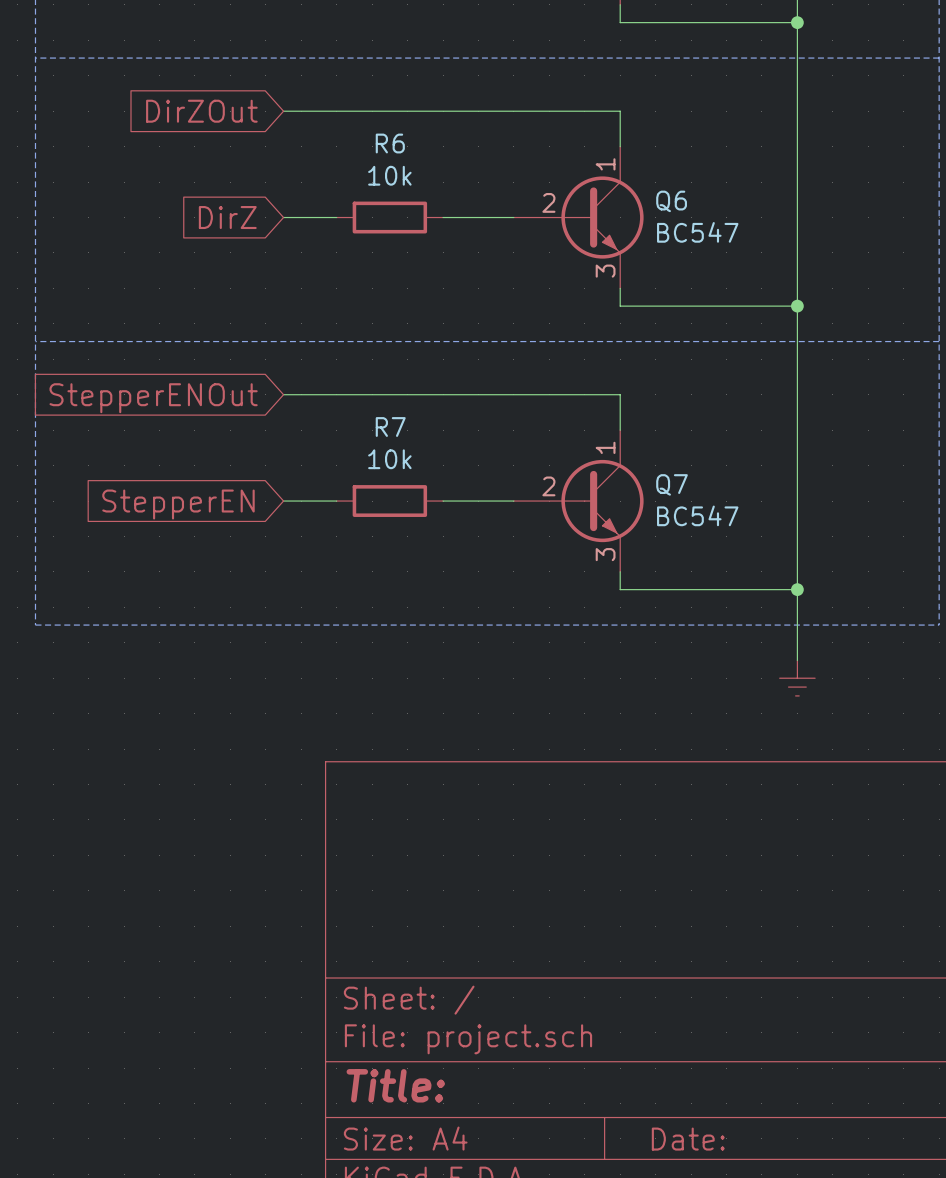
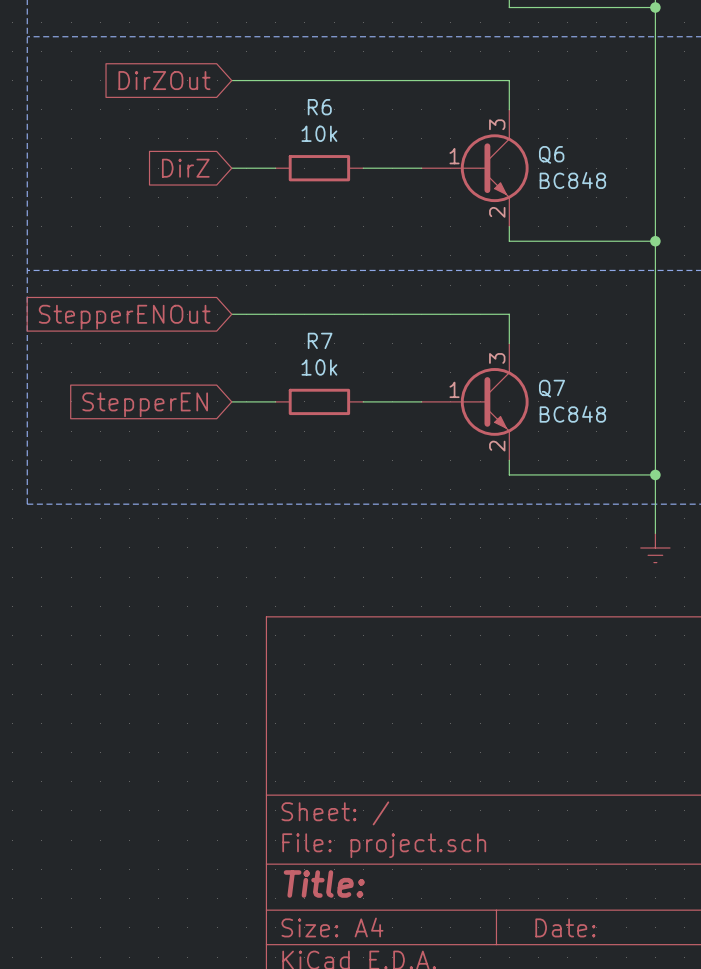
Q6 symbol: [513, 146, 644, 289] -> [421, 109, 529, 227]
Q6 value: BC547 (697, 232) -> BC848 (572, 180)
Q7 symbol: [513, 430, 644, 572] -> [421, 343, 529, 461]
Q7 value: BC547 (697, 515) -> BC848 (572, 414)

